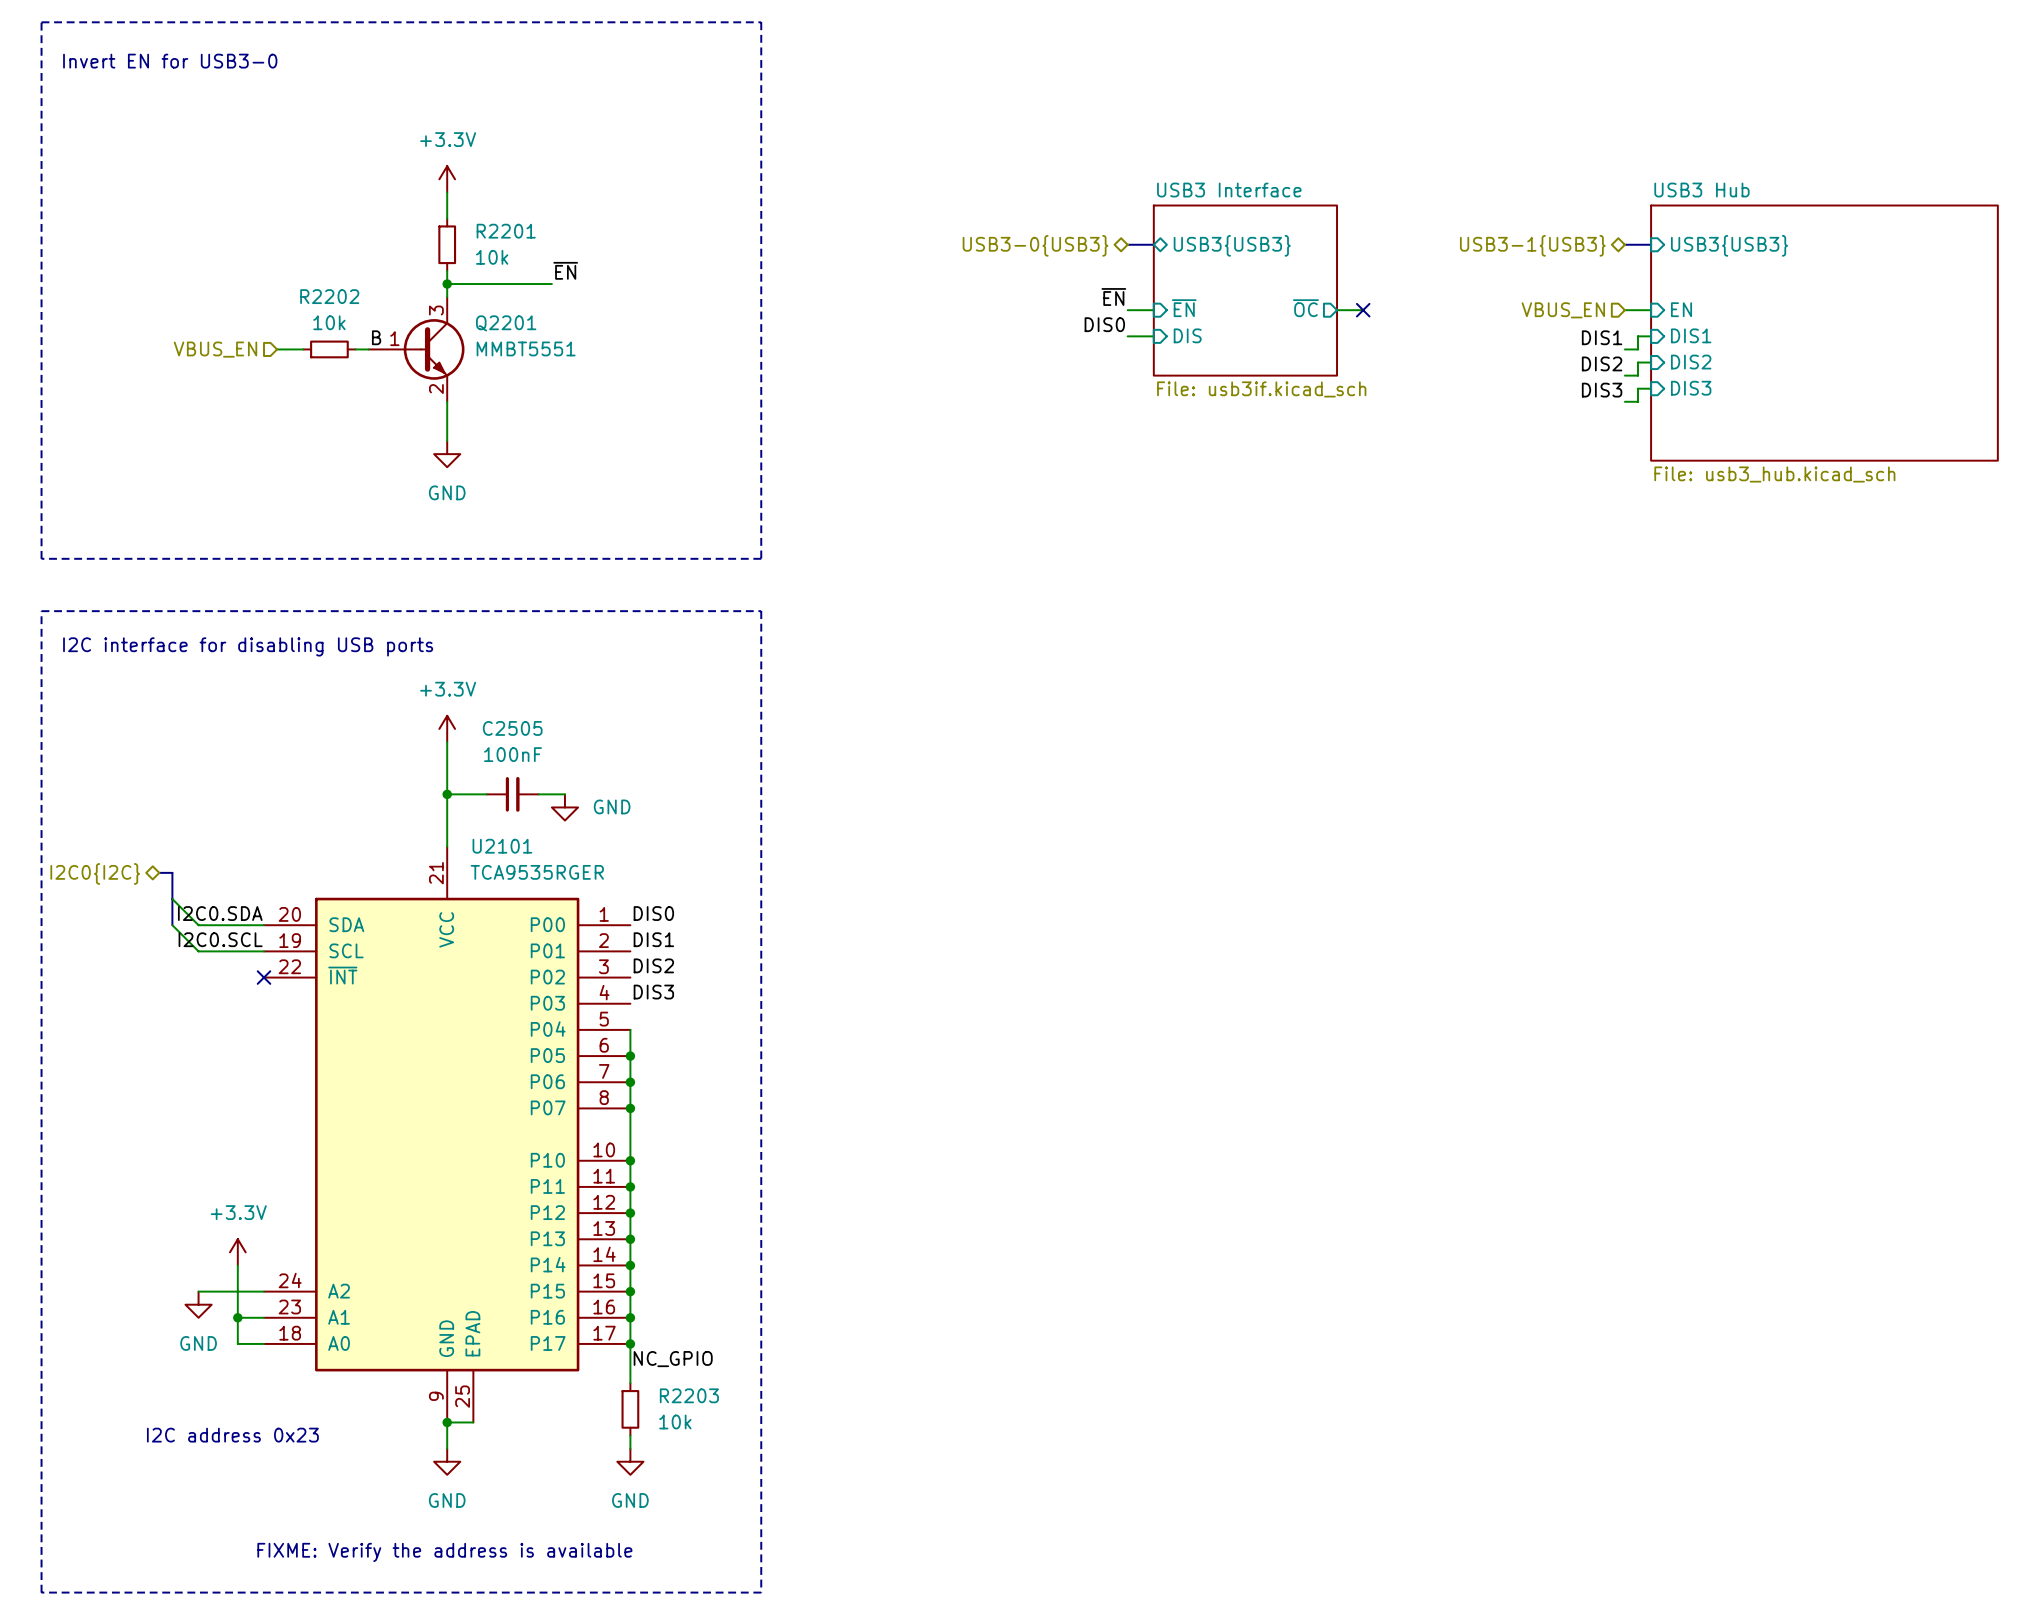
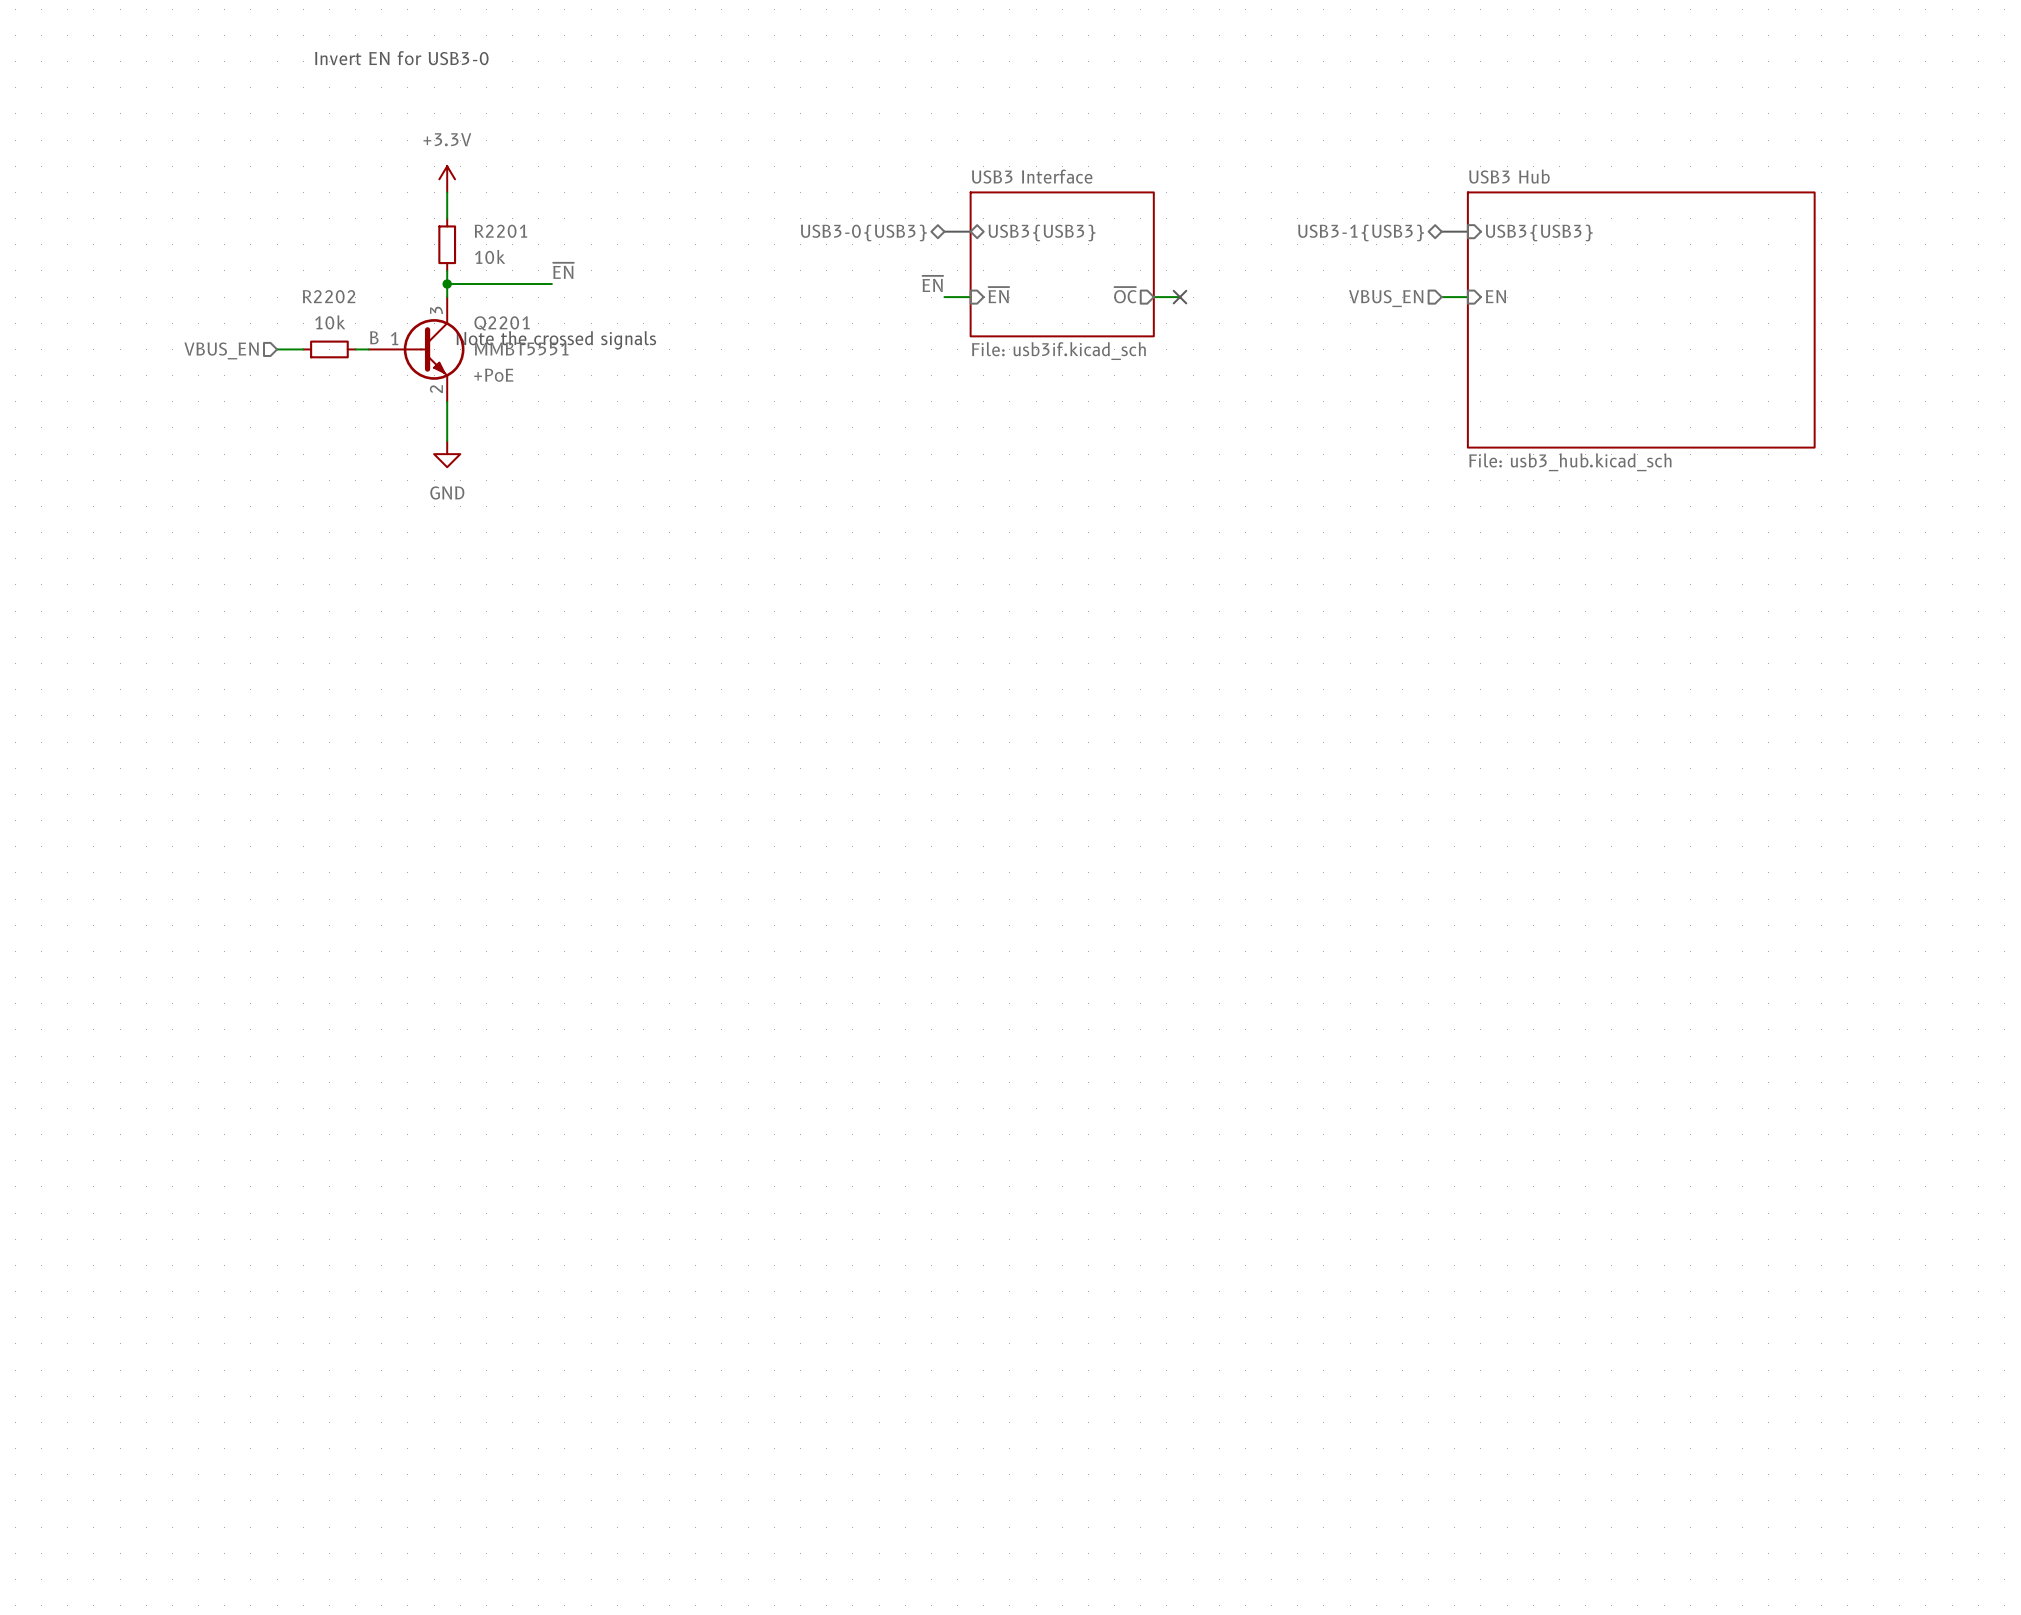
line: (41, 22) (761, 22) (761, 558) (41, 558) (41, 22) -> none
text position: Invert EN for USB3-0 (170, 61) -> Invert EN for USB3-0 (401, 58)
sheet USB3 Interface shape: [1153, 204, 1338, 377] -> [969, 191, 1155, 338]
sheet pin: none -> USB3{USB3} (1042, 232)
sheet pin: none -> USB3{USB3} (1539, 232)
bus: (1127, 244) (1153, 244) -> (944, 231) (970, 231)
bus: (1624, 244) (1651, 244) -> (1441, 231) (1467, 231)
hierarchical label position: USB3-0{USB3} (1035, 245) -> USB3-0{USB3} (863, 232)
sheet pin: USB3{USB3} (1232, 245) -> none
hierarchical label position: USB3-1{USB3} (1532, 245) -> USB3-1{USB3} (1361, 232)
sheet pin: USB3{USB3} (1729, 245) -> none
label position: ~{EN} (1113, 297) -> ~{EN} (932, 283)
no-connect mark: none -> (1179, 297)
sheet pin position: ~{EN} (1184, 308) -> ~{EN} (998, 295)
sheet pin position: ~{OC} (1305, 308) -> ~{OC} (1125, 295)
sheet pin position: EN (1681, 309) -> EN (1495, 296)
wire: (1127, 310) (1153, 310) -> (944, 297) (970, 297)
wire: (1337, 310) (1363, 310) -> (1153, 297) (1179, 297)
no-connect mark: (1363, 310) -> none
hierarchical label position: VBUS_EN (1563, 310) -> VBUS_EN (1386, 298)
wire: (1624, 310) (1651, 310) -> (1441, 297) (1467, 297)
label: DIS0 (1104, 324) -> none
sheet USB3 Hub position: (1824, 333) -> (1641, 320)
sheet pin: DIS (1187, 335) -> none
sheet pin: DIS1 (1691, 335) -> none
wire: (1651, 336) (1637, 336) (1637, 349) (1624, 349) -> none
label: DIS1 (1602, 337) -> none
text: none -> Note the crossed signals (556, 340)
wire: (1651, 362) (1637, 362) (1637, 375) (1624, 375) -> none
sheet pin: DIS2 (1691, 362) -> none
label: DIS2 (1602, 363) -> none
Q2201 text: none -> +PoE (493, 375)
wire: (1651, 388) (1637, 388) (1637, 401) (1624, 401) -> none
sheet pin: DIS3 (1691, 388) -> none
label: DIS3 (1602, 390) -> none
line: (41, 611) (41, 1592) (761, 1592) (761, 611) (41, 611) -> none
text: I2C interface for disabling USB ports (248, 646) -> none
power symbol: +3.3V (447, 728) -> none
wire: (447, 742) (447, 846) -> none
wire: (447, 794) (486, 794) -> none
junction: (447, 794) -> none
C2505: 100nF (512, 794) -> none
wire: (538, 794) (564, 794) -> none
power symbol: GND (564, 807) -> none
bus: (159, 872) (172, 872) (172, 925) -> none
hierarchical label: I2C0{I2C} (95, 873) -> none
wire: (172, 899) (198, 925) (263, 925) -> none
label: I2C0.SDA (220, 913) -> none
label: DIS0 (653, 913) -> none
wire: (172, 925) (198, 951) (263, 951) -> none
label: I2C0.SCL (220, 939) -> none
label: DIS1 (653, 939) -> none
label: DIS2 (653, 965) -> none
no-connect mark: (263, 977) -> none
label: DIS3 (653, 992) -> none
wire: (630, 1029) (630, 1383) -> none
junction: (630, 1056) -> none
junction: (630, 1082) -> none
junction: (630, 1108) -> none
U2101: TCA9535RGER (447, 1134) -> none
junction: (630, 1160) -> none
junction: (630, 1186) -> none
junction: (630, 1213) -> none
junction: (630, 1239) -> none
power symbol: +3.3V (237, 1252) -> none
wire: (237, 1265) (237, 1343) (263, 1343) -> none
junction: (630, 1265) -> none
wire: (198, 1291) (263, 1291) -> none
junction: (630, 1291) -> none
power symbol: GND (198, 1304) -> none
wire: (237, 1317) (263, 1317) -> none
junction: (237, 1317) -> none
junction: (630, 1317) -> none
junction: (630, 1343) -> none
label: NC_GPIO (673, 1359) -> none
R2203: 10k (630, 1409) -> none
junction: (447, 1422) -> none
wire: (473, 1422) (447, 1422) (447, 1448) -> none
text: I2C address 0x23 (232, 1435) -> none
wire: (630, 1435) (630, 1448) -> none
power symbol: GND (447, 1461) -> none
power symbol: GND (630, 1461) -> none
text: FIXME: Verify the address is available (444, 1552) -> none

